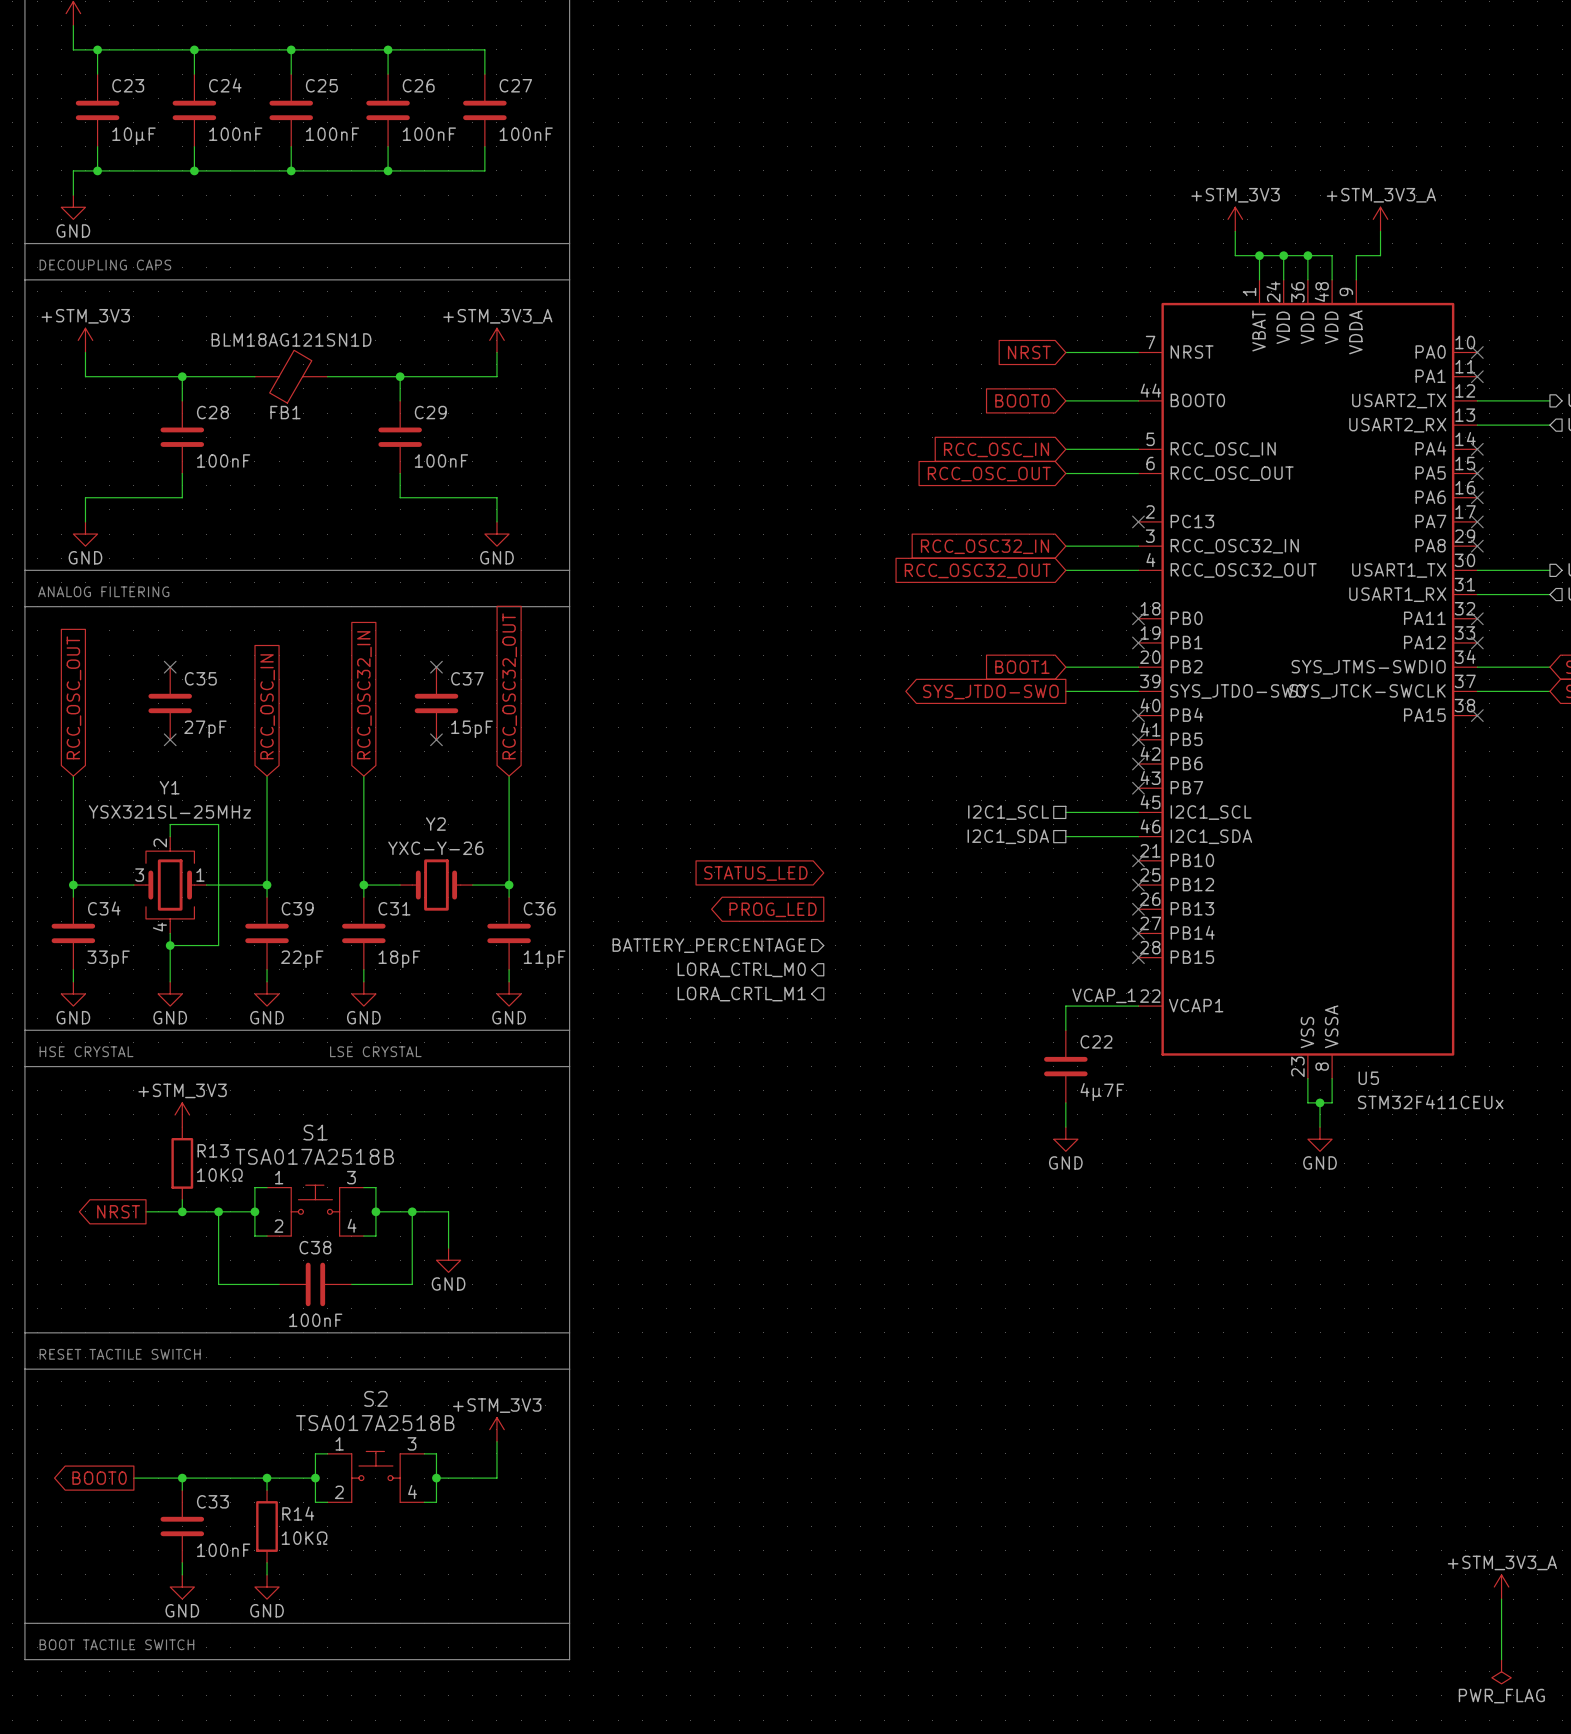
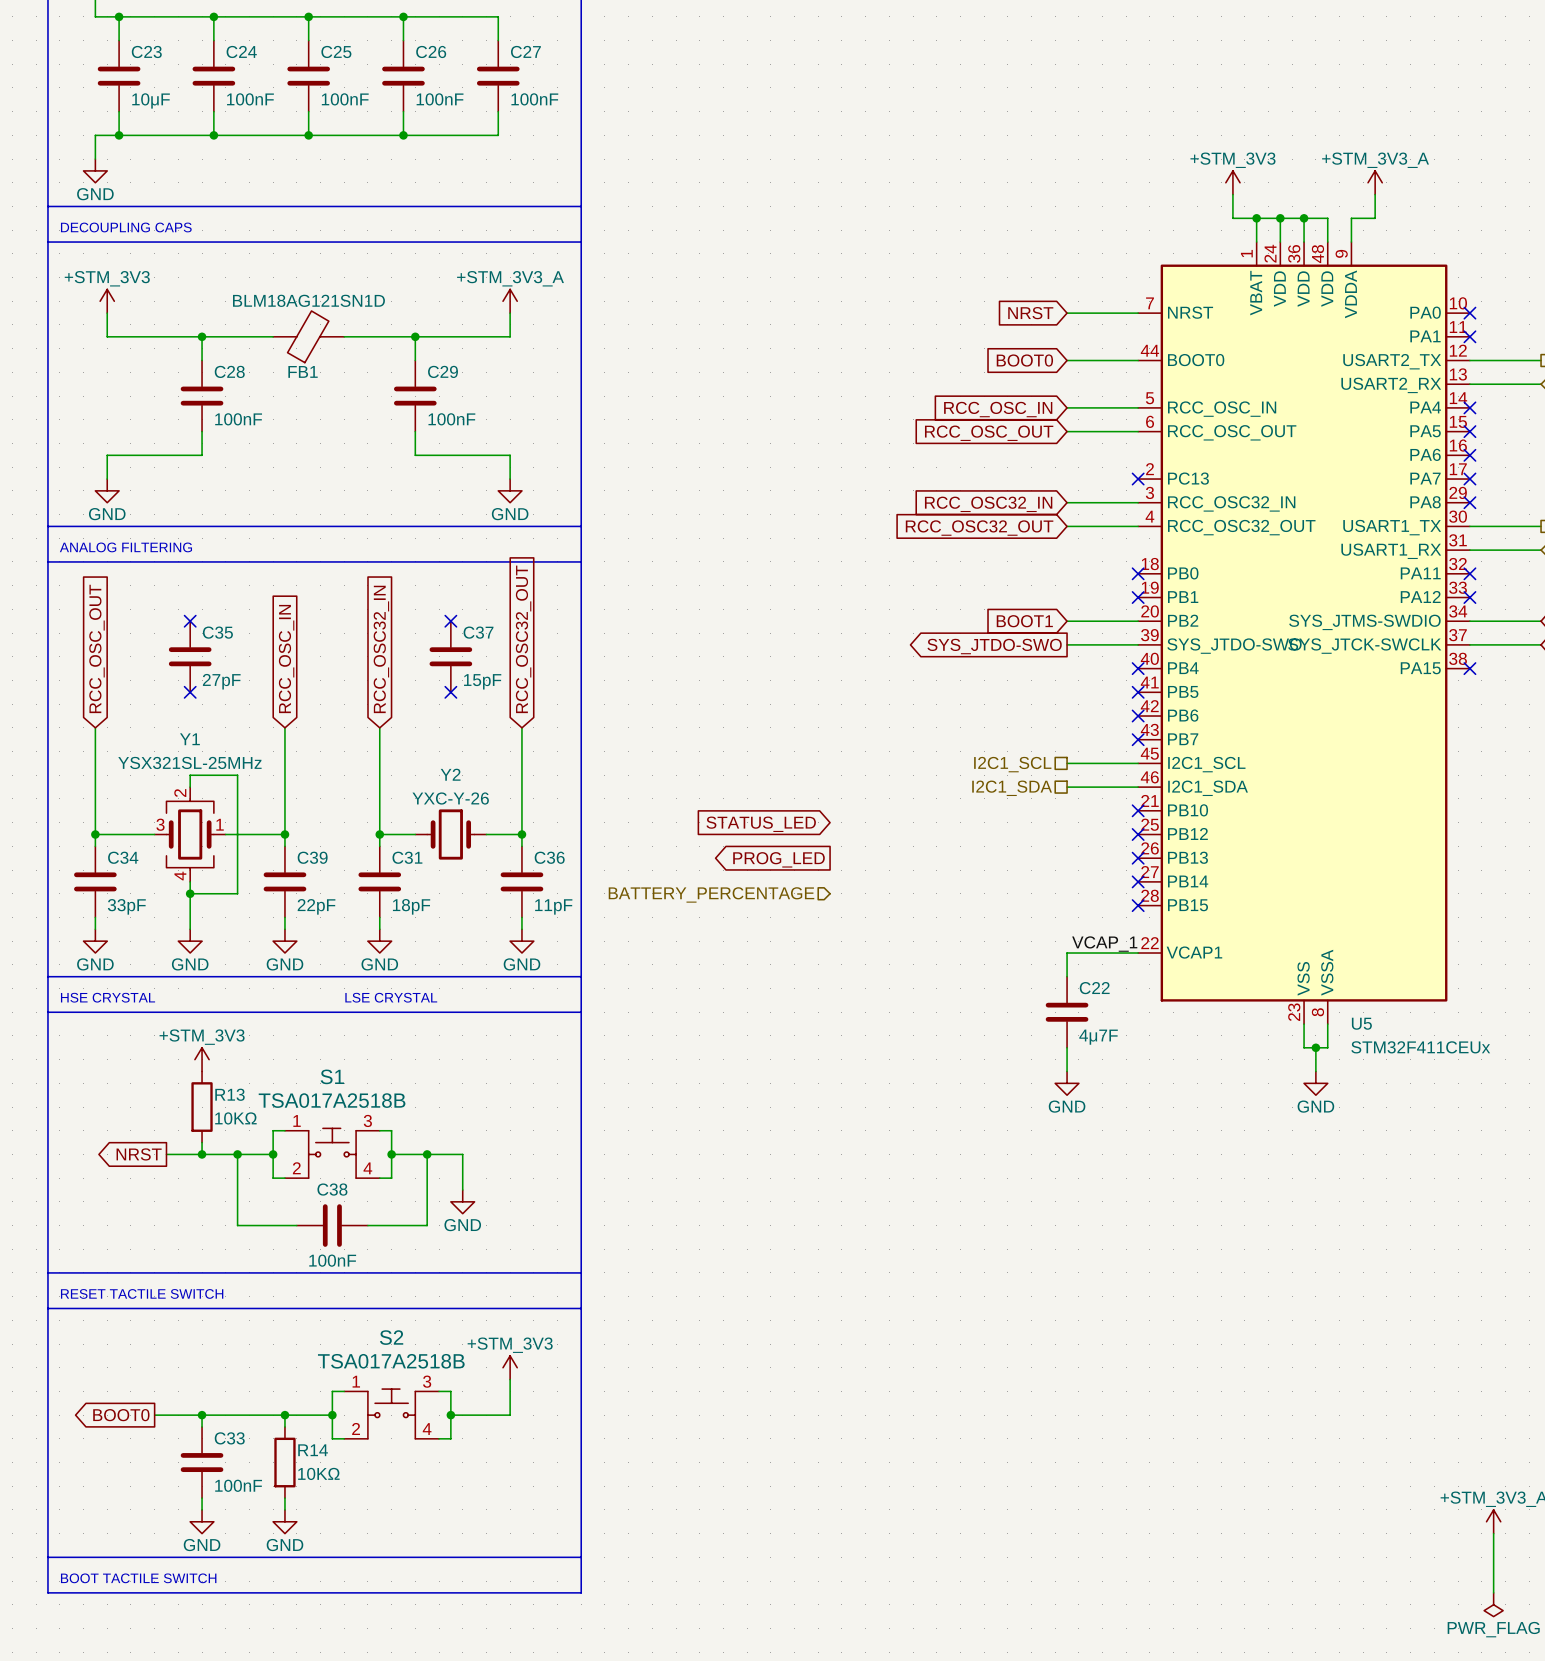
hierarchical label: LORA_CTRL_M0 (741, 969) -> none
hierarchical label: LORA_CRTL_M1 (741, 994) -> none

